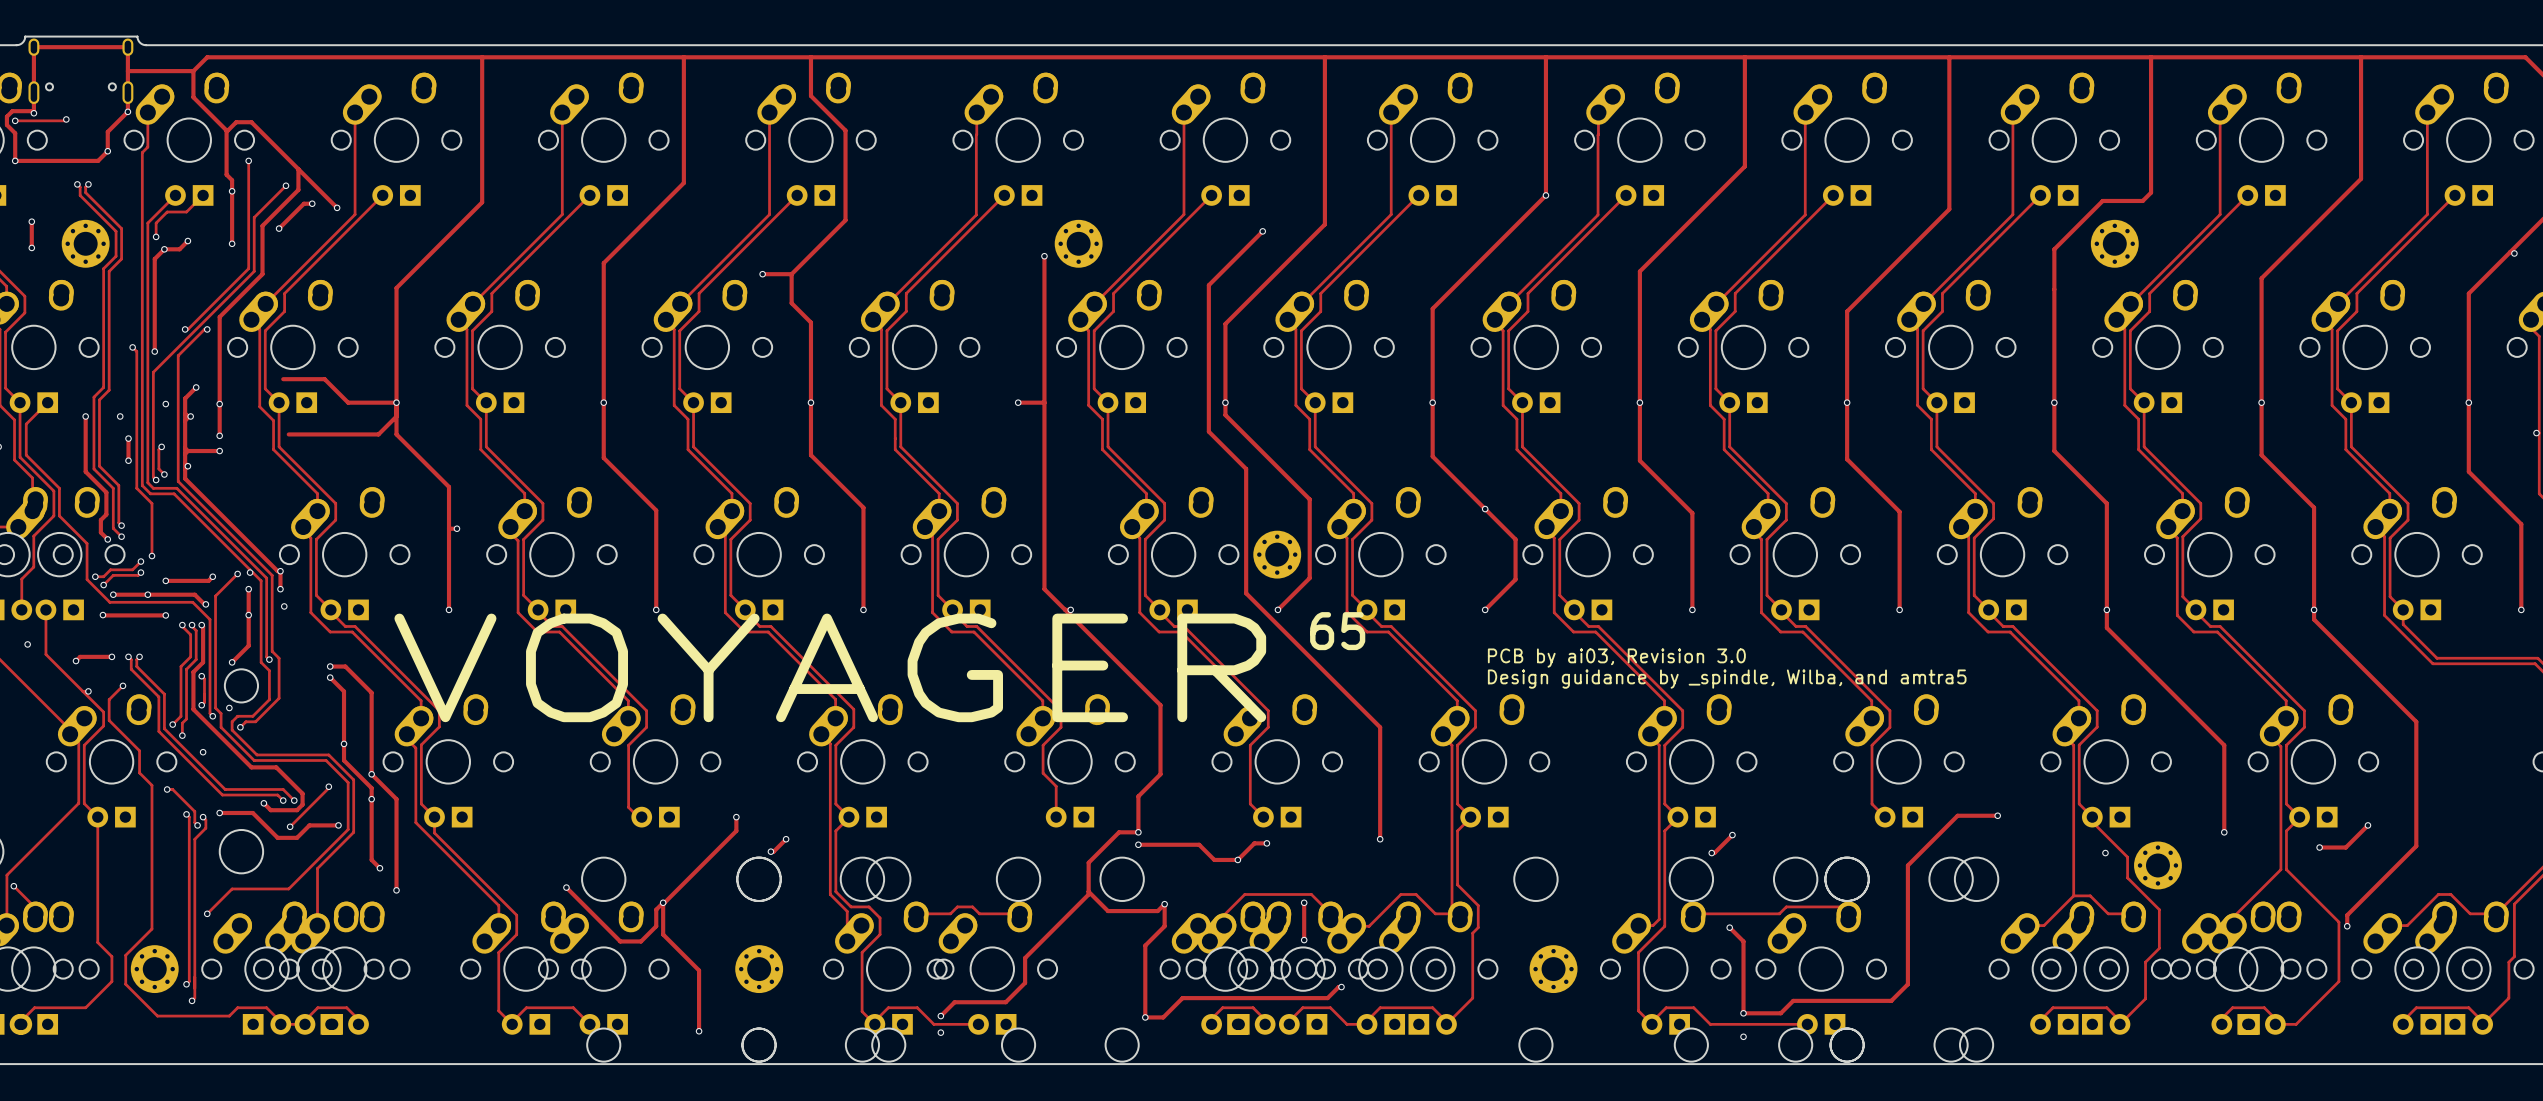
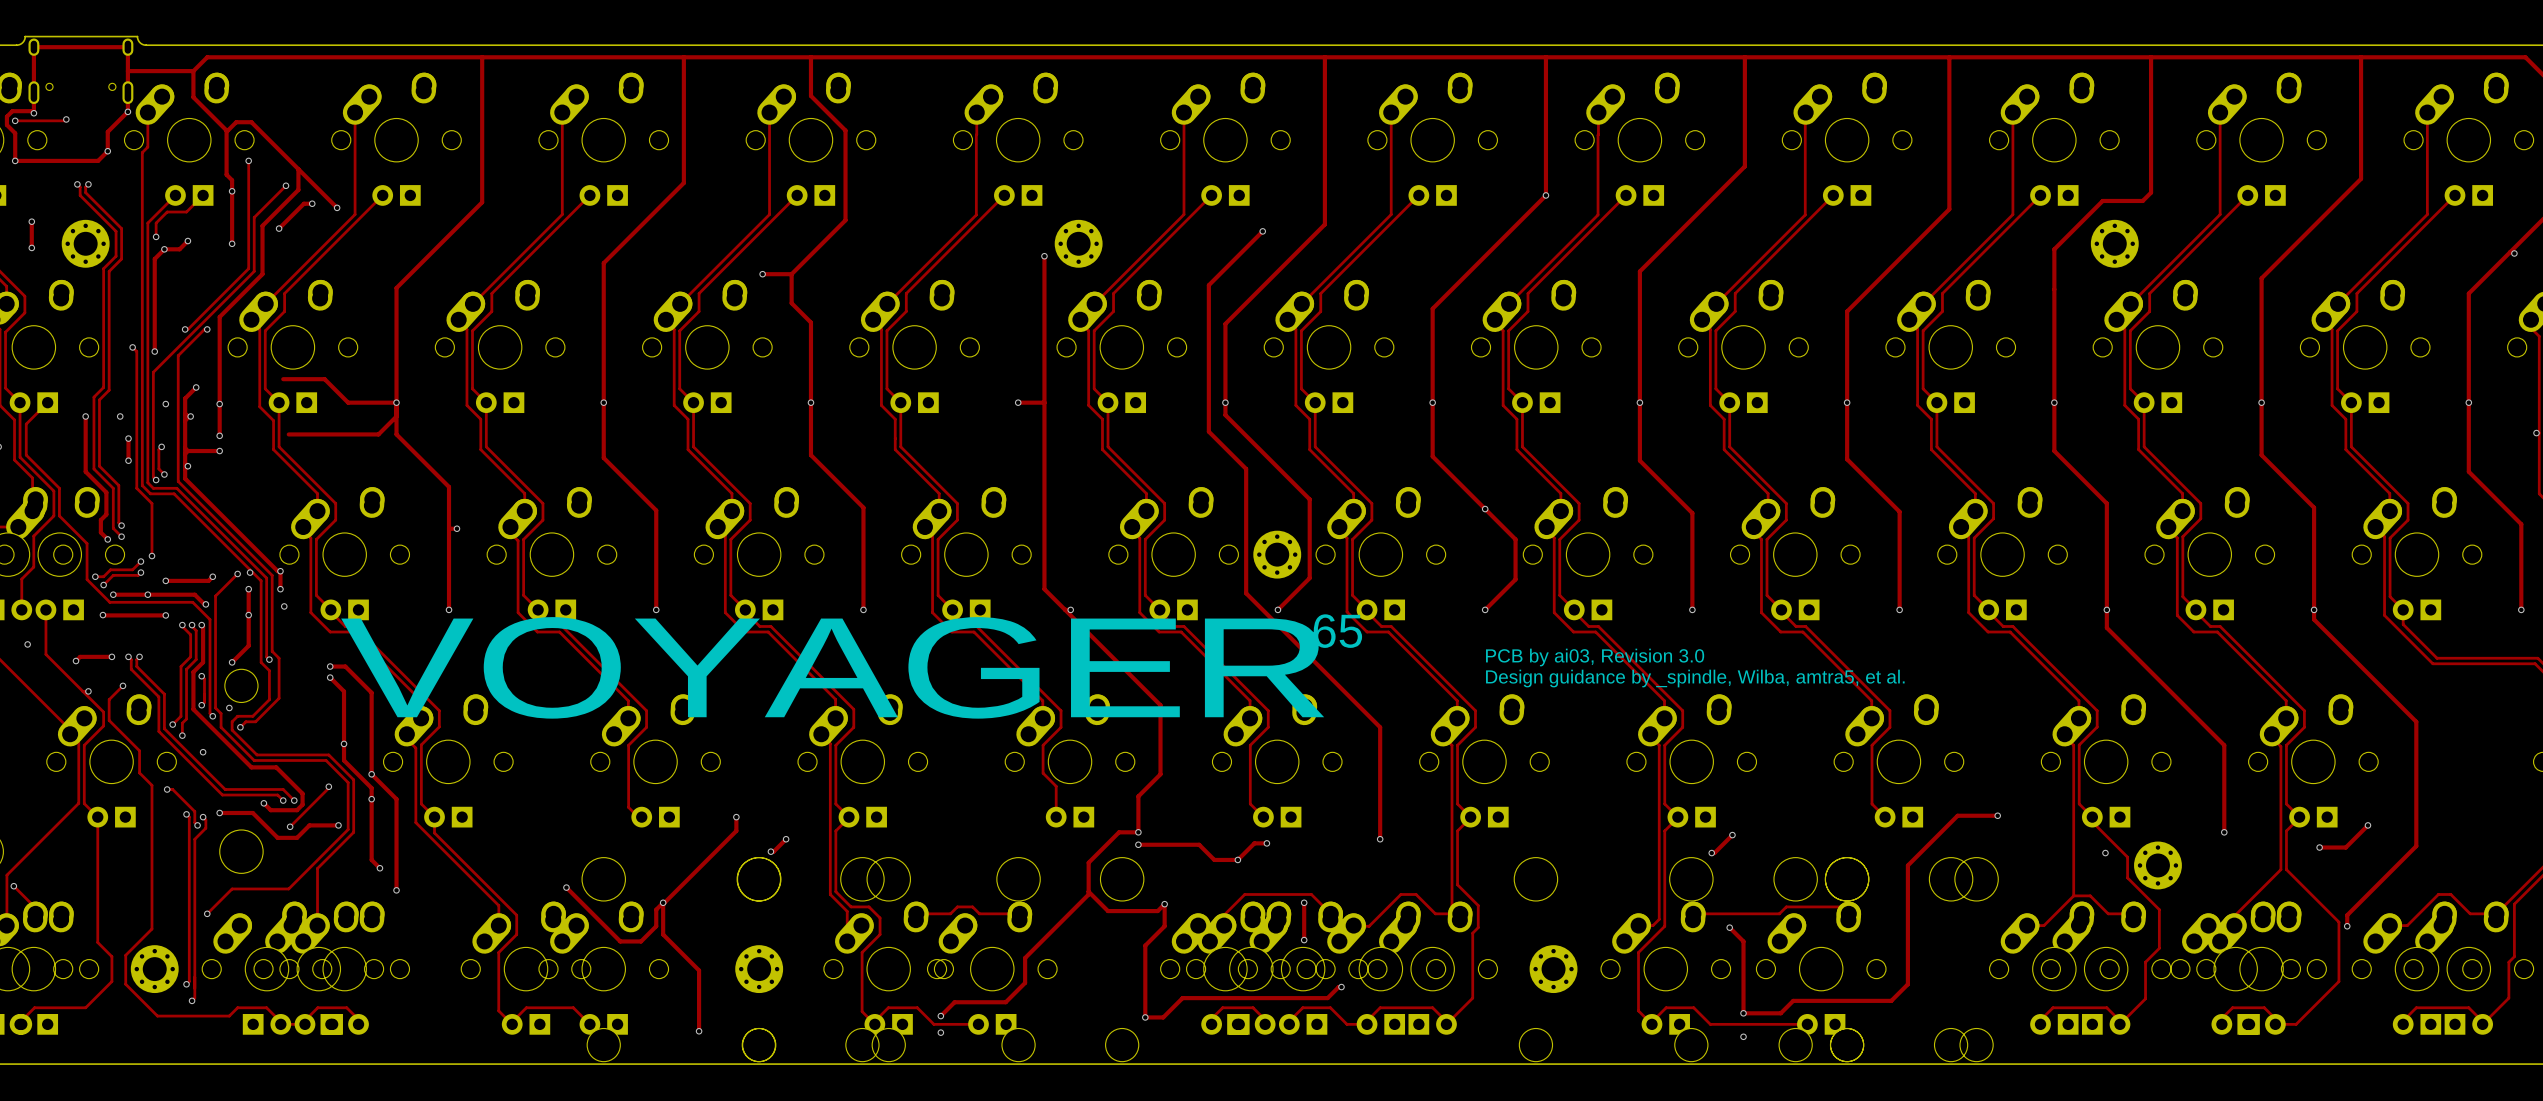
text: Design guidance by _spindle, Wilba, and amtra5 (1727, 679) -> Design guidance by _spindle, Wilba, amtra5, et al. (1695, 678)

